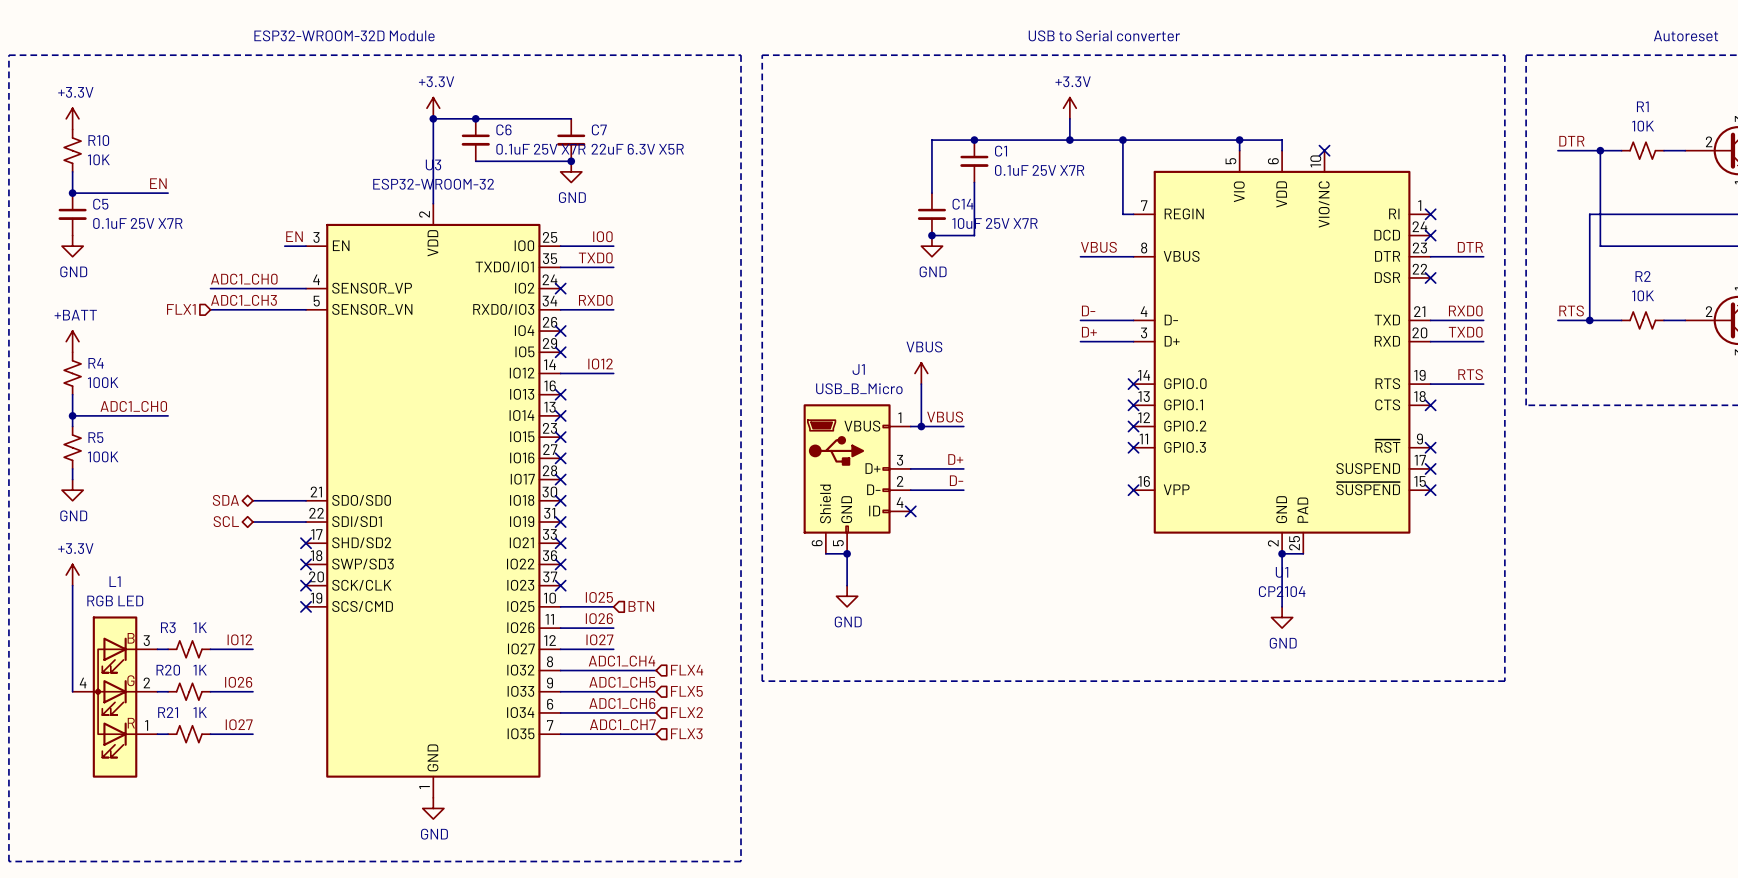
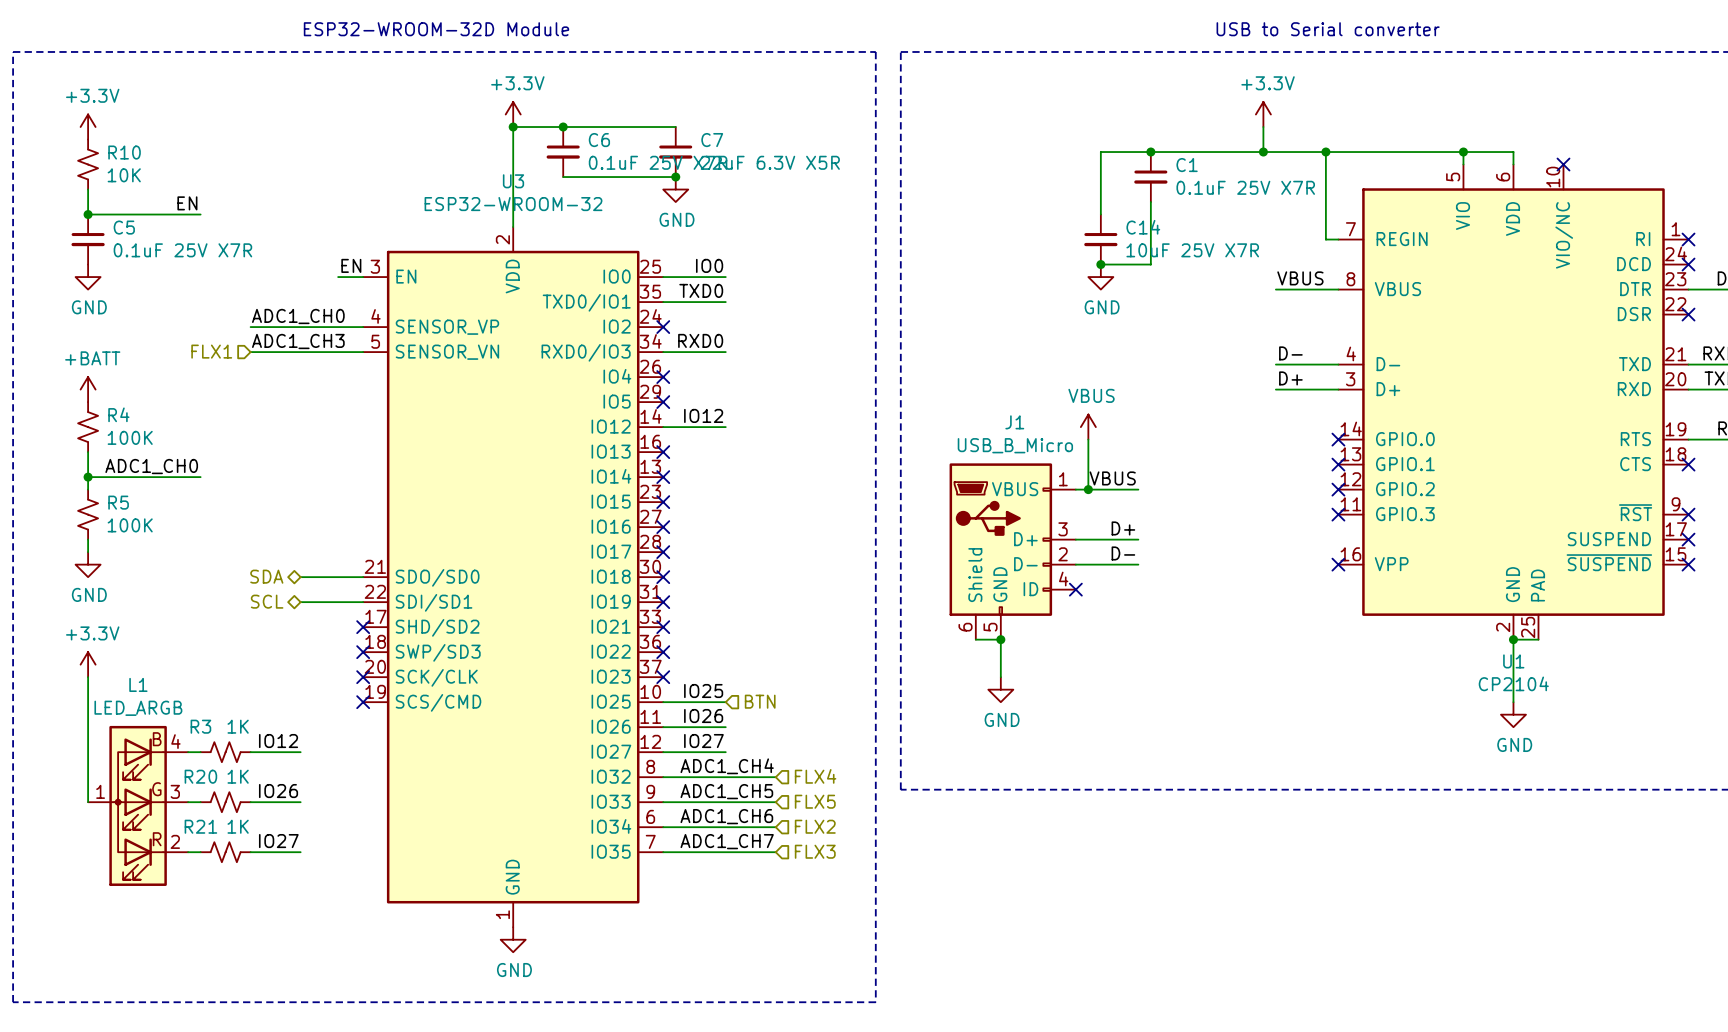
L1 value: RGB LED (115, 600) -> LED_ARGB (138, 708)
L1 symbol: [72, 616, 158, 778] -> [88, 725, 189, 886]

